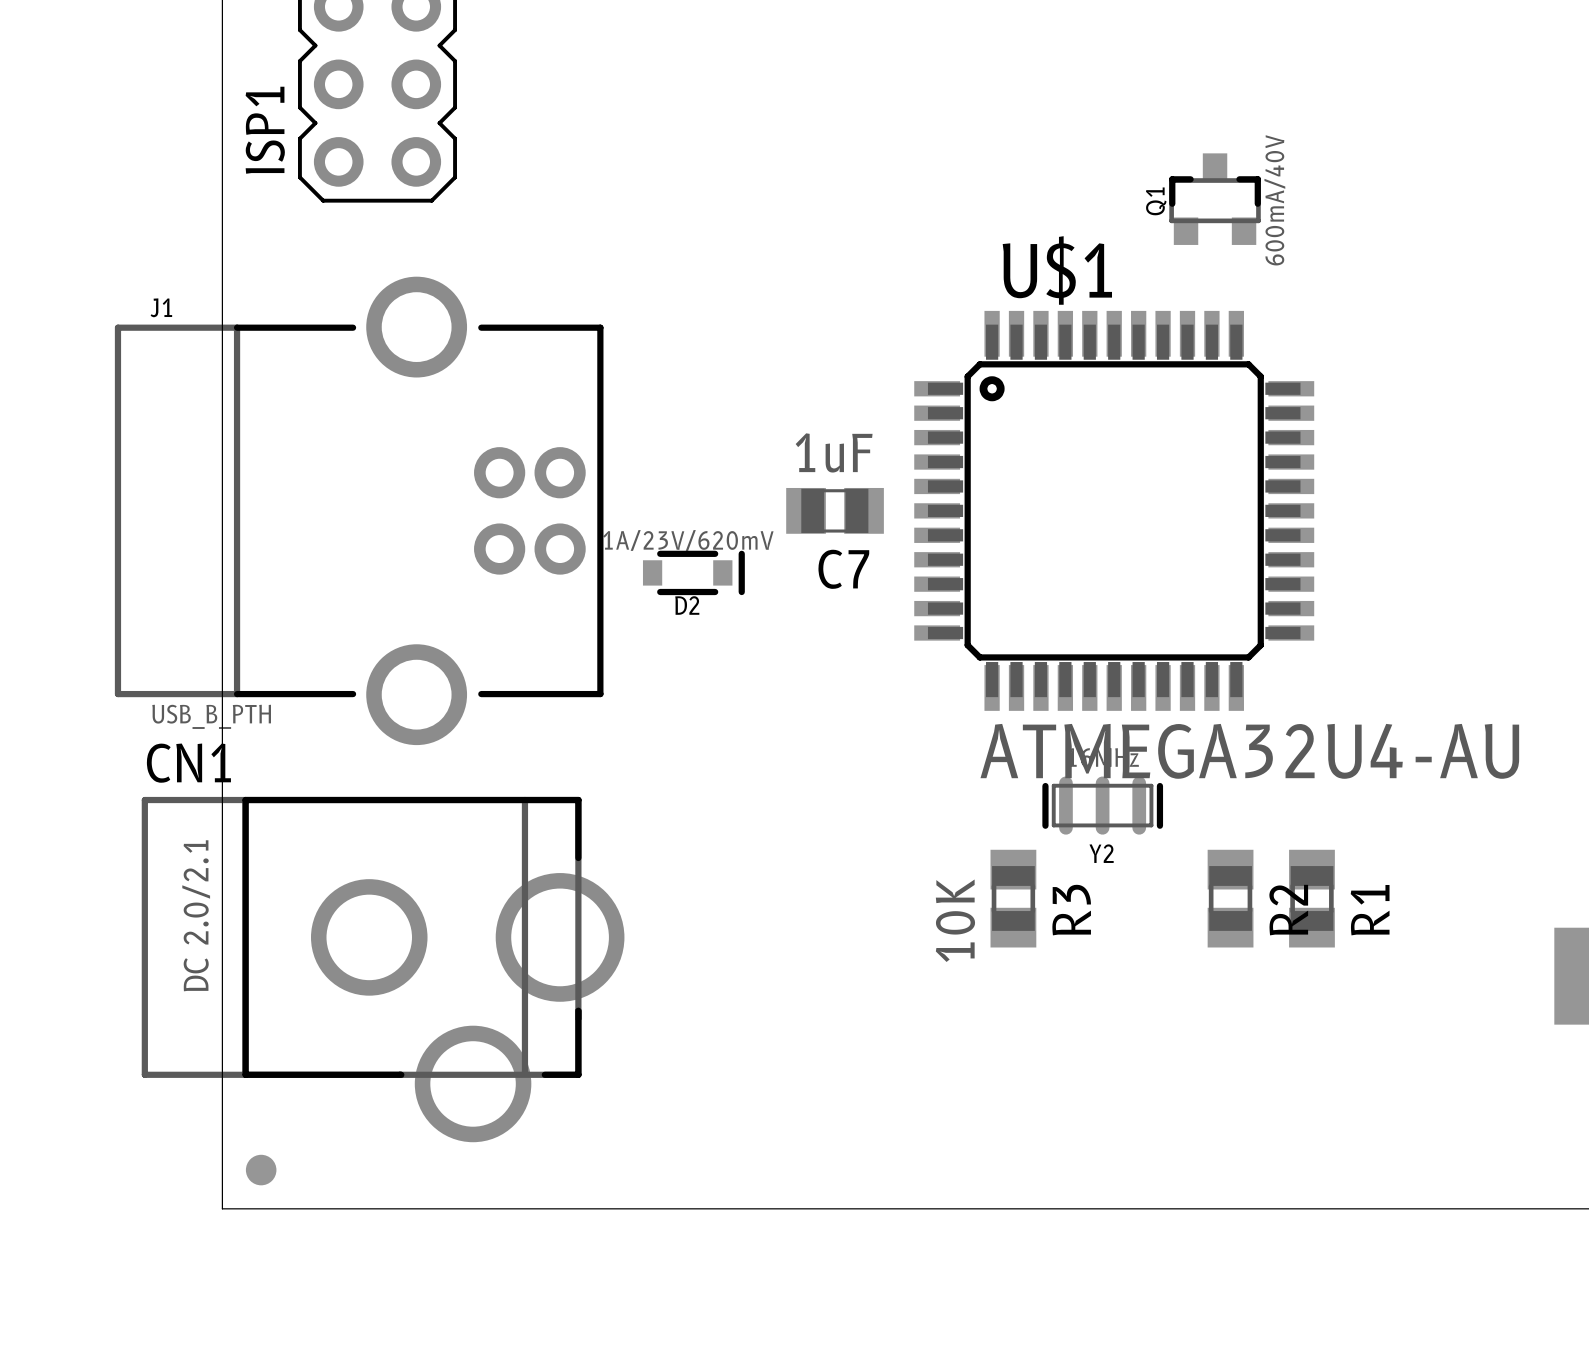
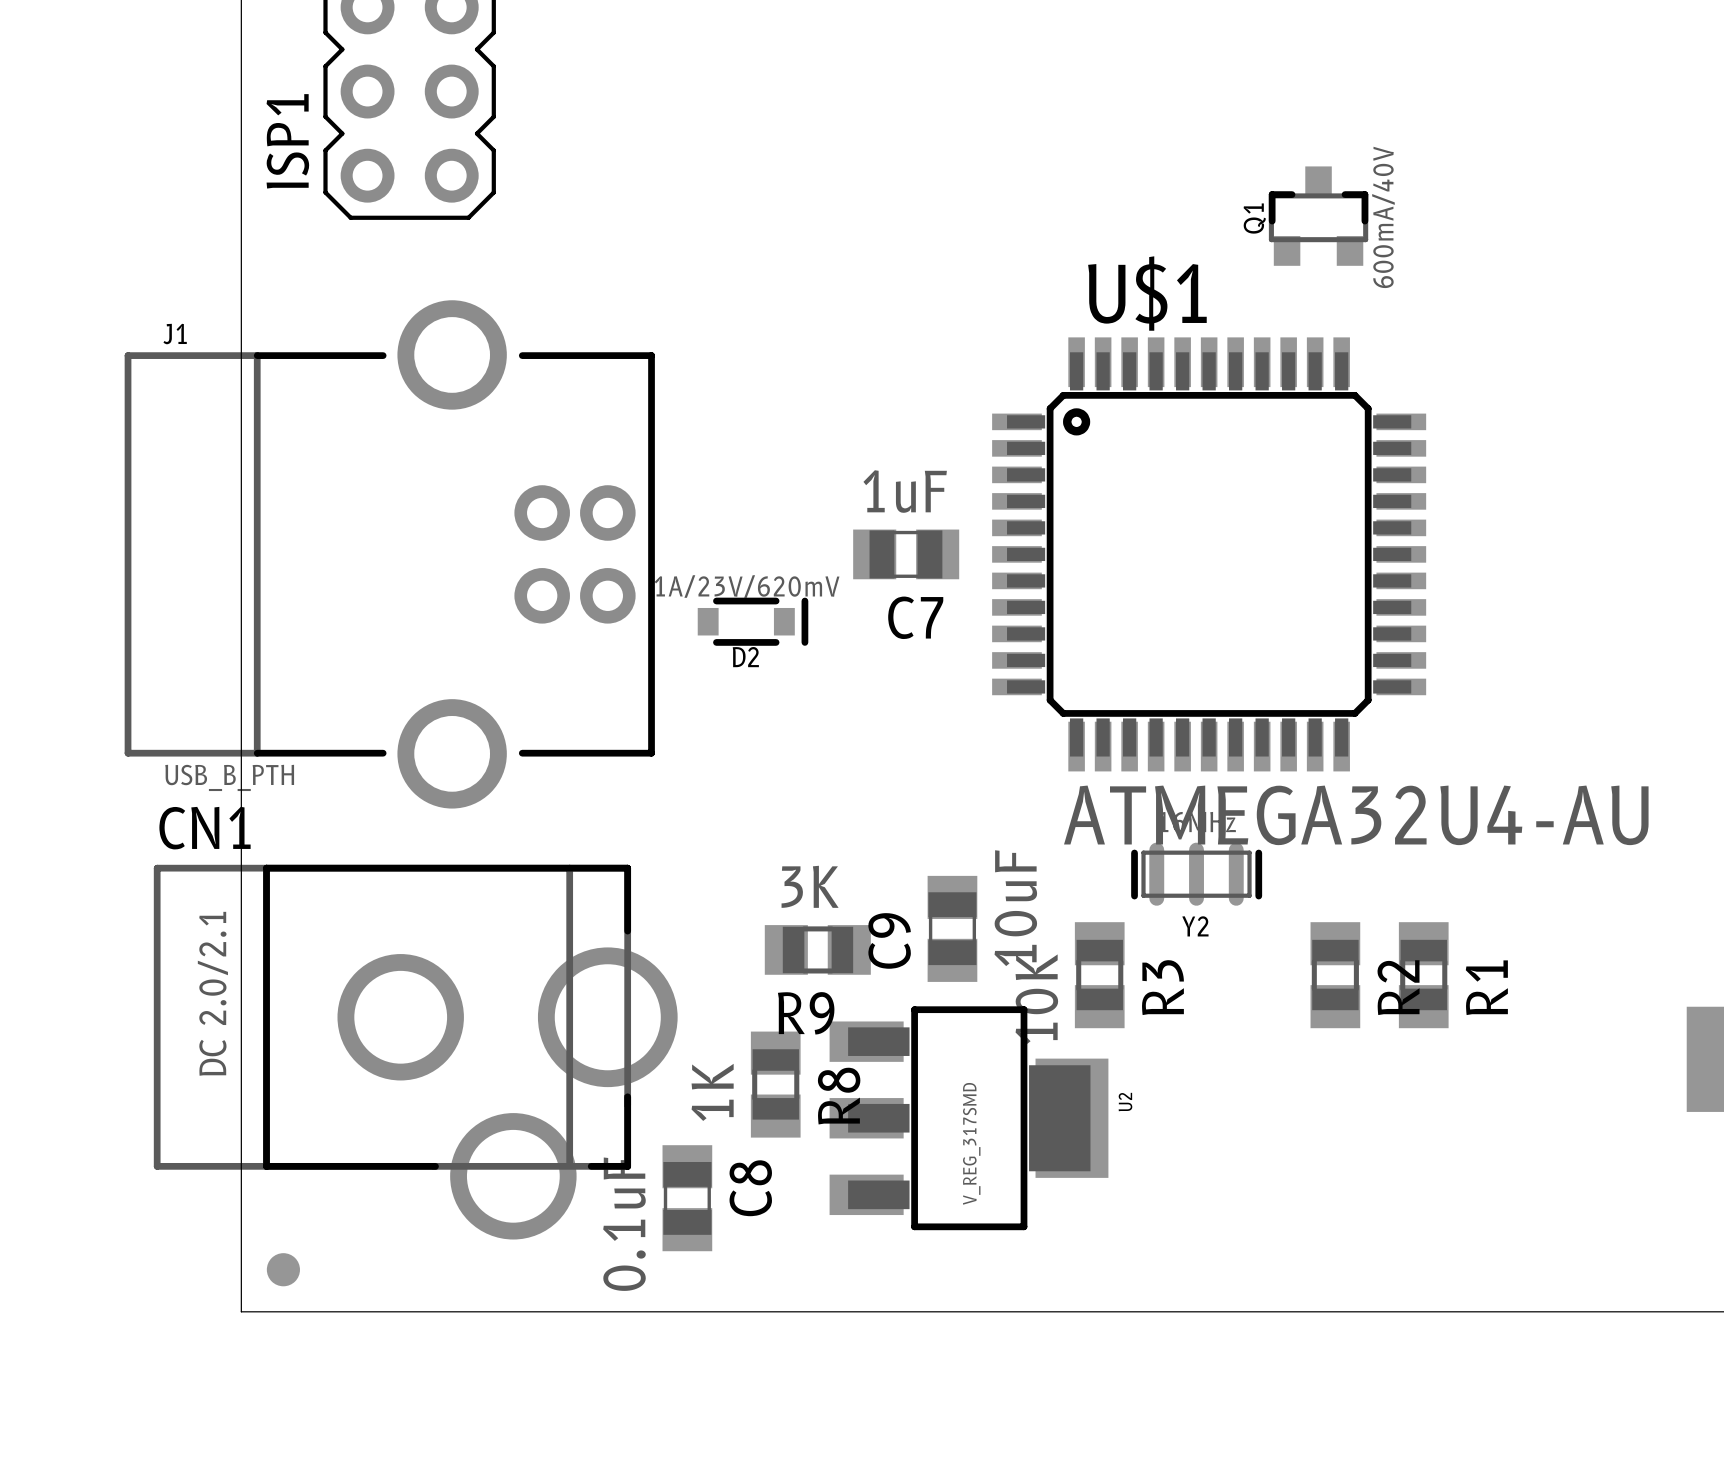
C9: none -> 10uF (952, 928)
R9: none -> 3K (817, 949)
R8: none -> 1K (775, 1084)
U2: none -> V_REG_317SMD (969, 1118)
C8: none -> 0.1uF (687, 1198)

